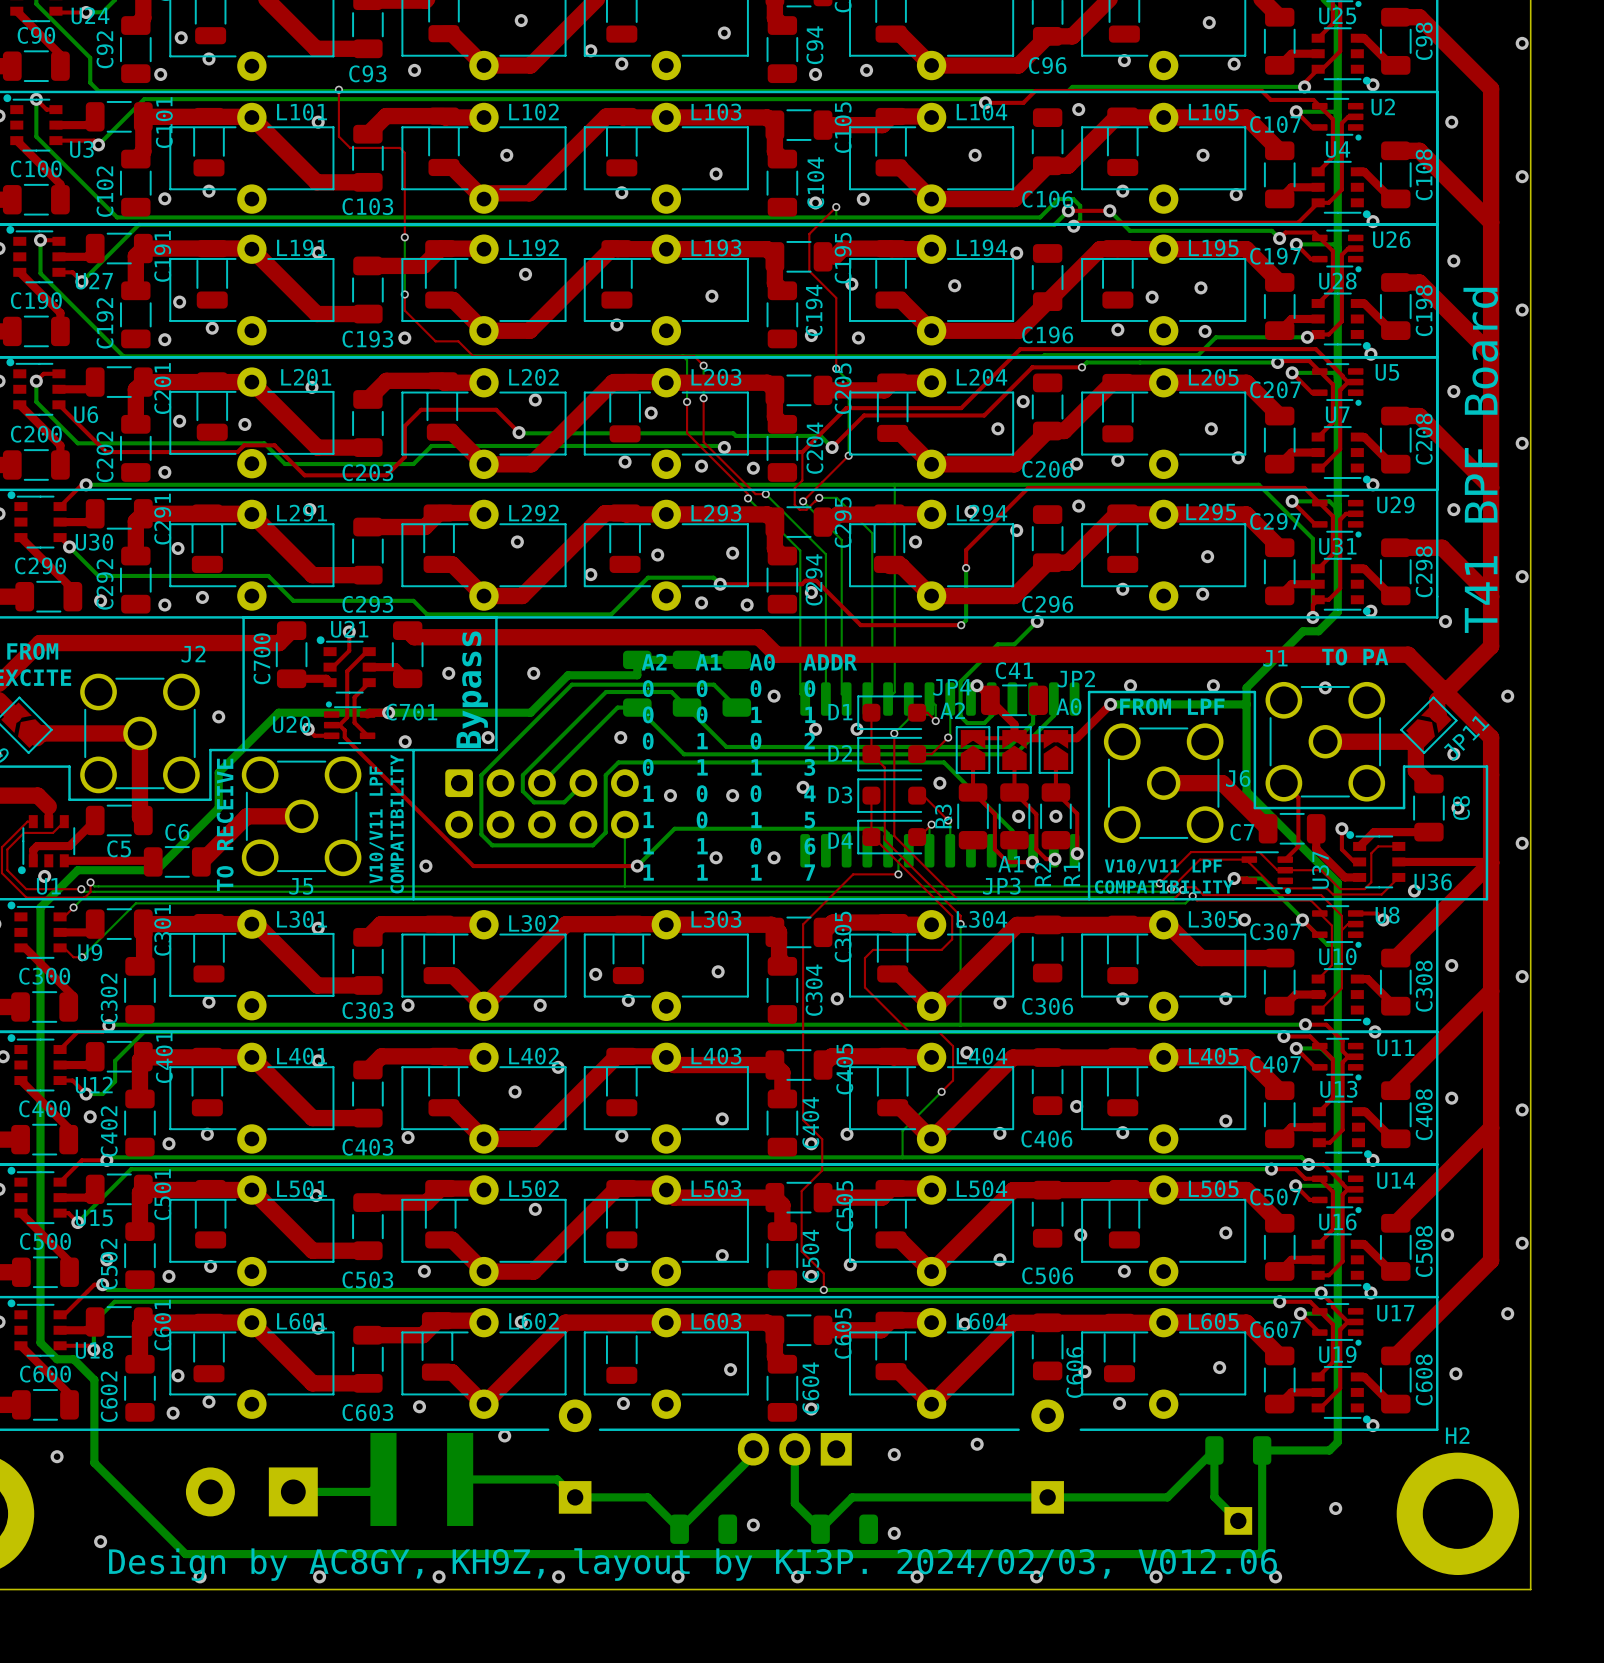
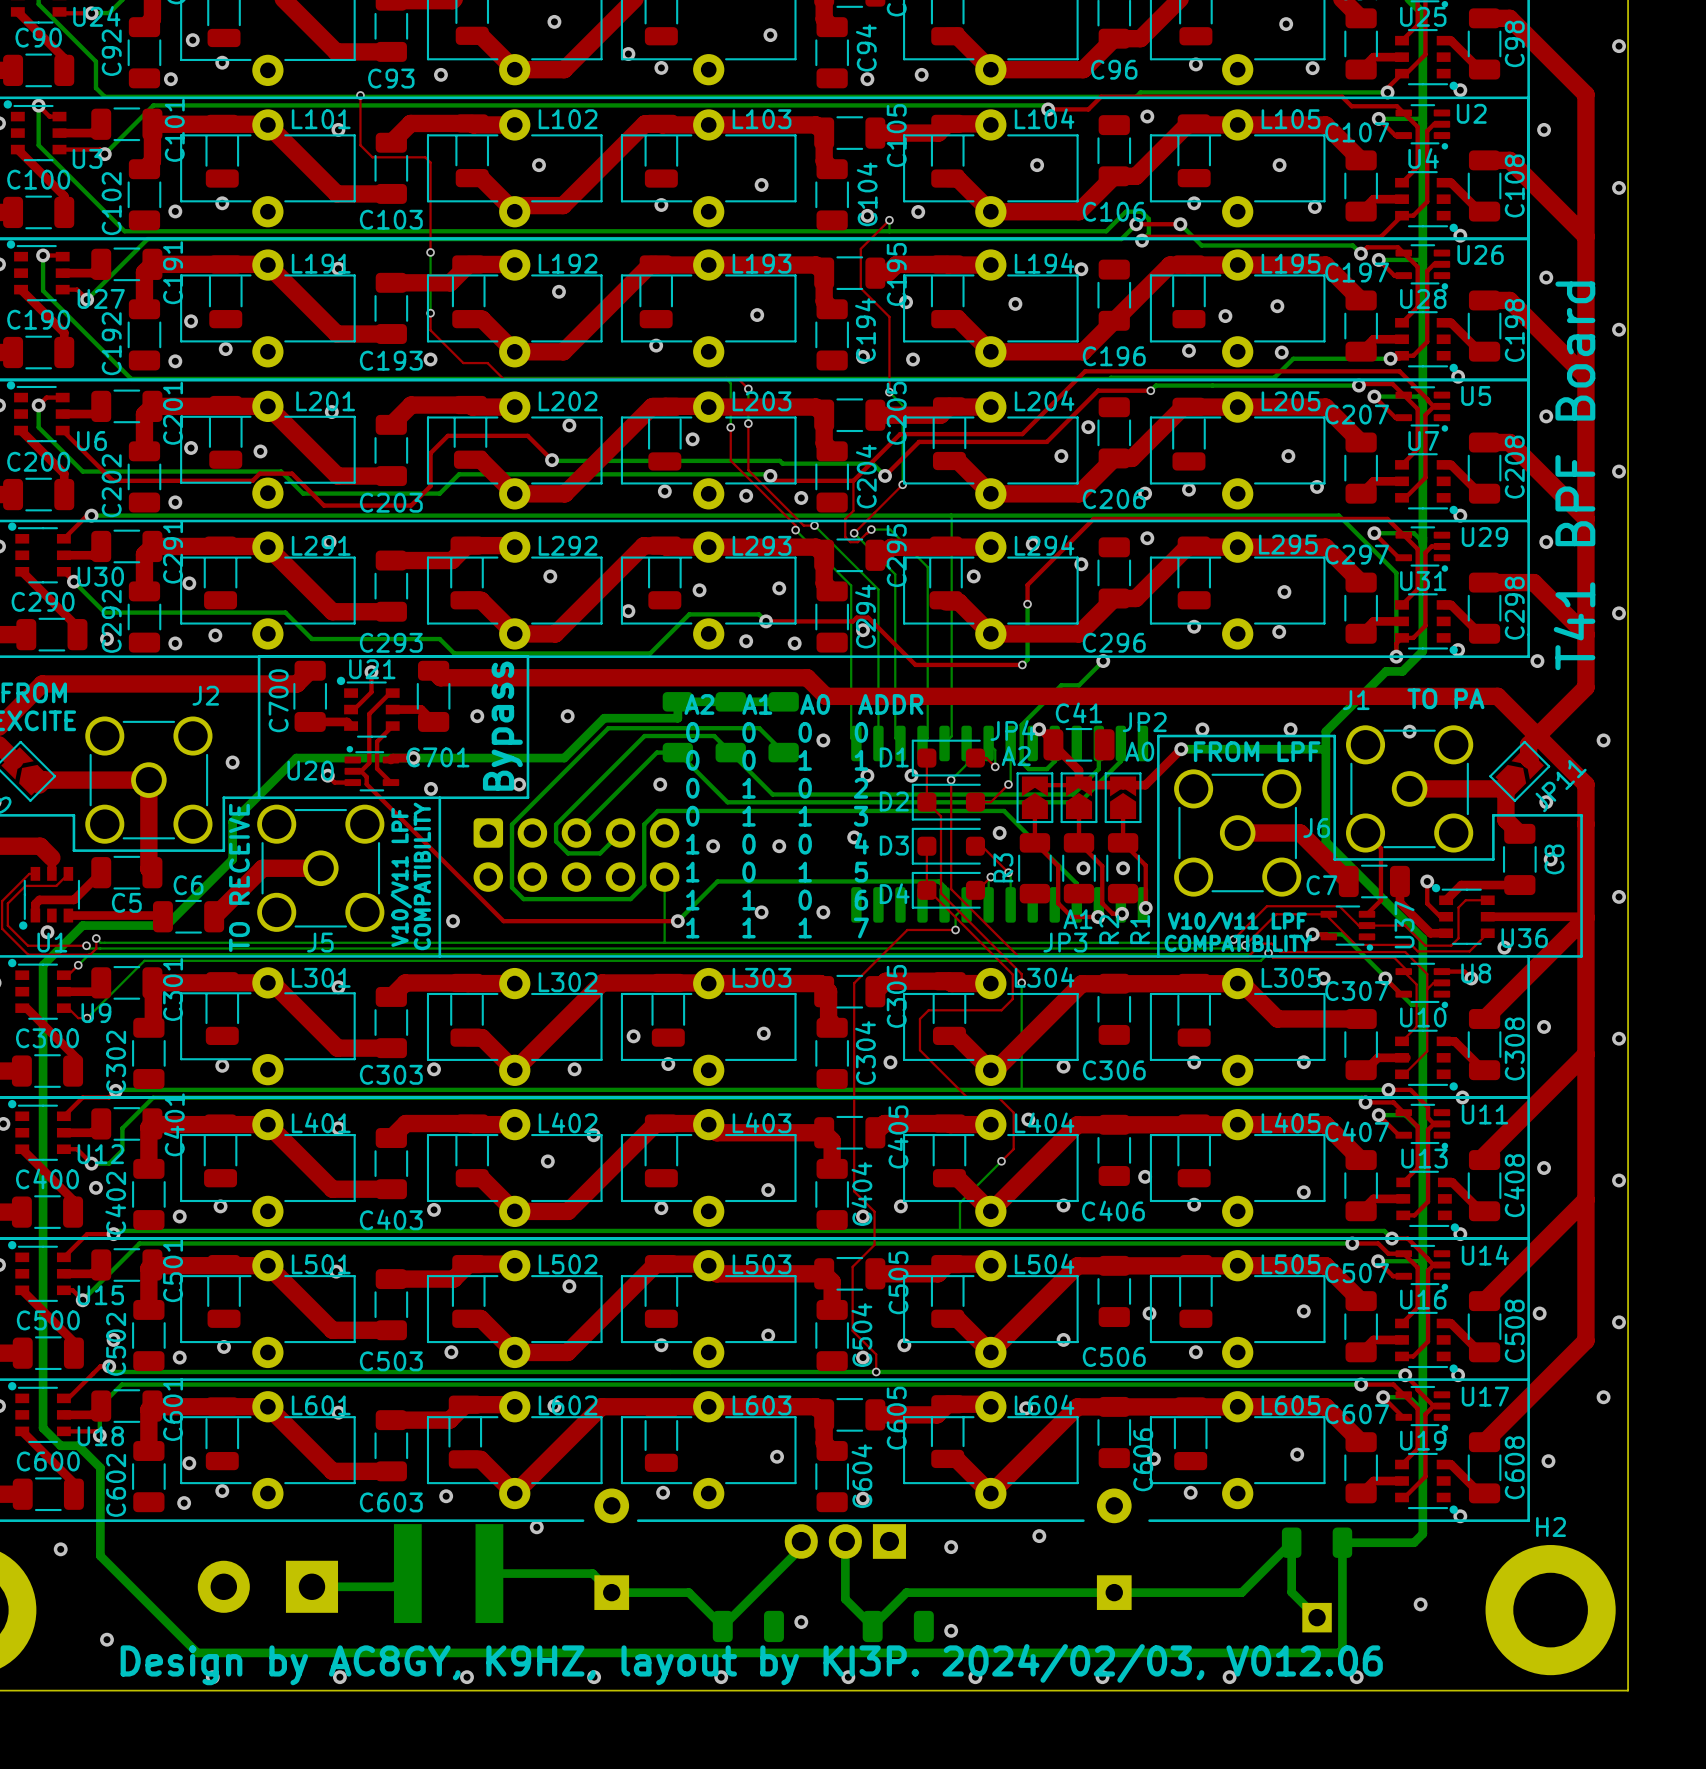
text: Design by AC8GY, KH9Z, layout by KI3P. 2024/02/03, V012.06 (692, 1564) -> Design by AC8GY, K9HZ, layout by KI3P. 2024/02/03, V012.06 (751, 1664)

